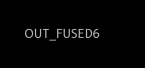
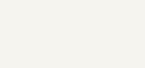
label: OUT_FUSED6 (62, 34) -> none

